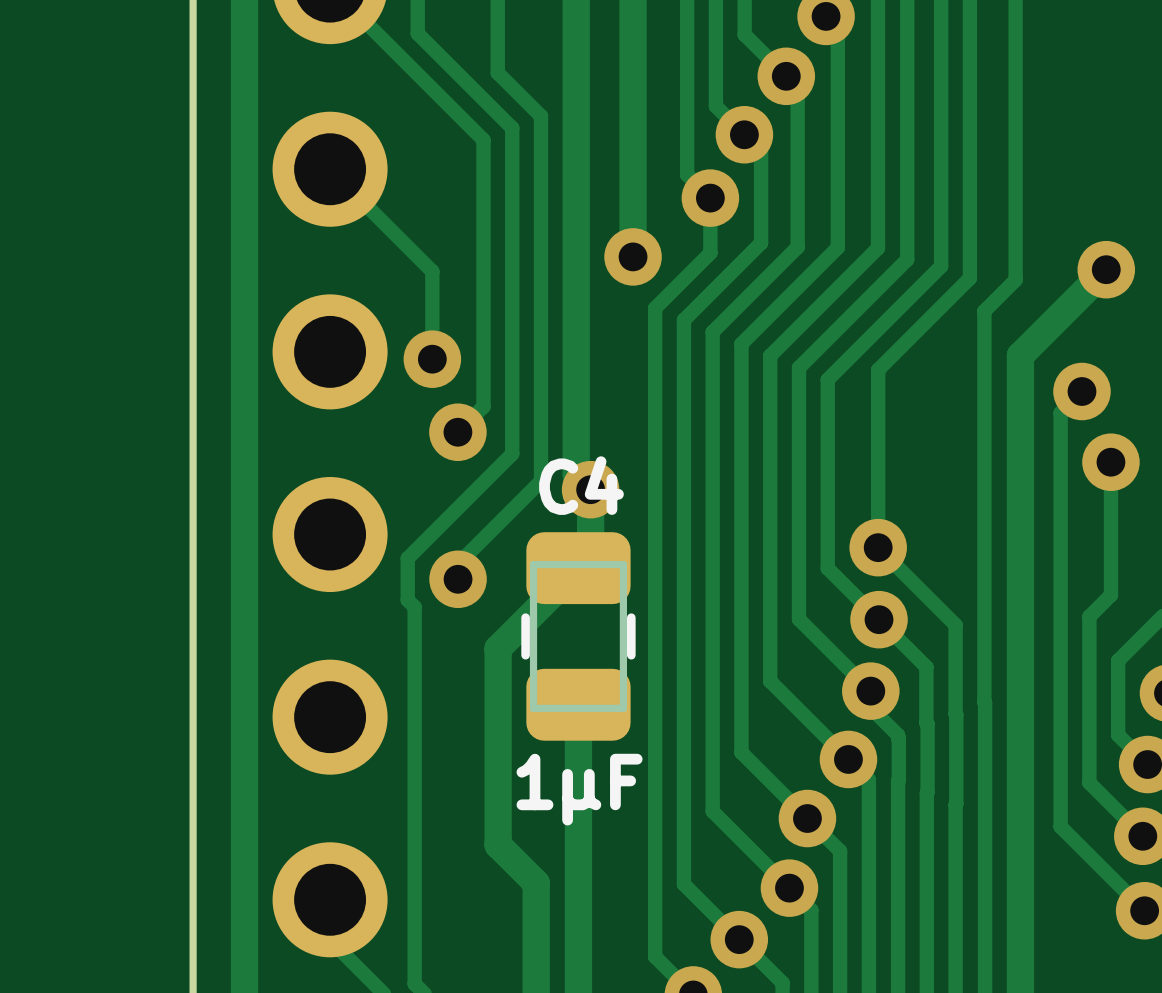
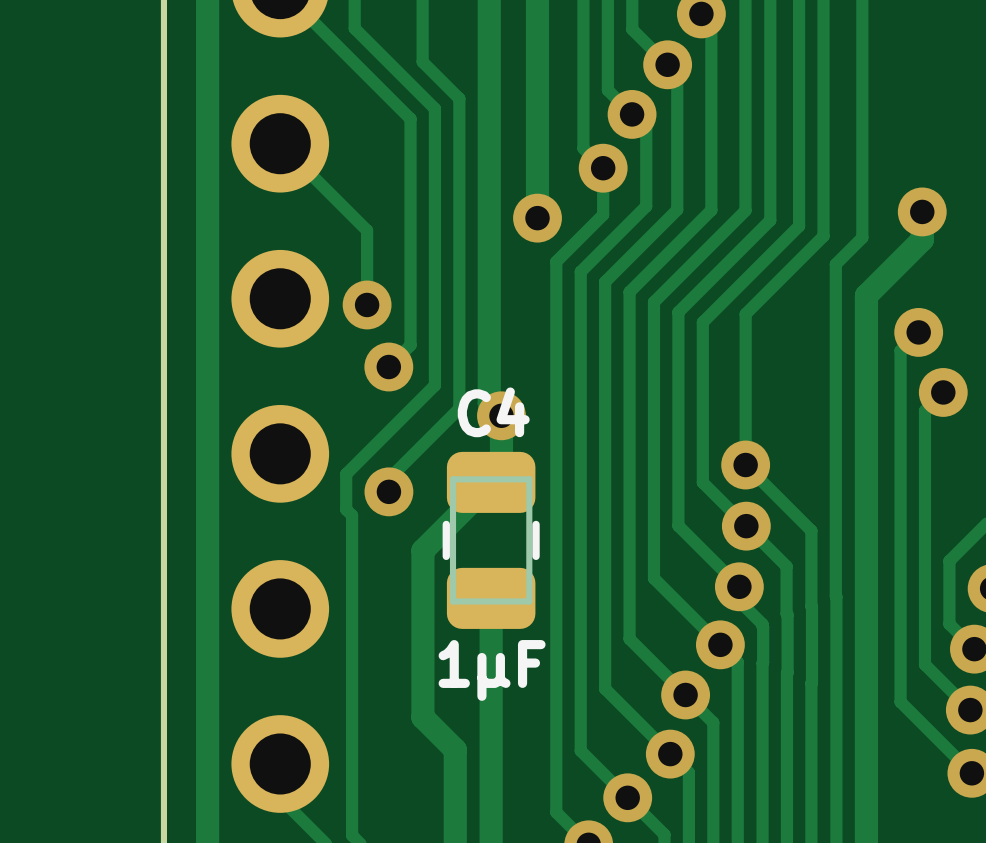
track: (1106, 269) (1020, 355) -> (922, 211) (922, 239) (866, 295) (866, 301)
via position: (1106, 269) -> (922, 211)
track: (1110, 462) (1110, 595) (1089, 616) -> (943, 392) (924, 410) (924, 523)

